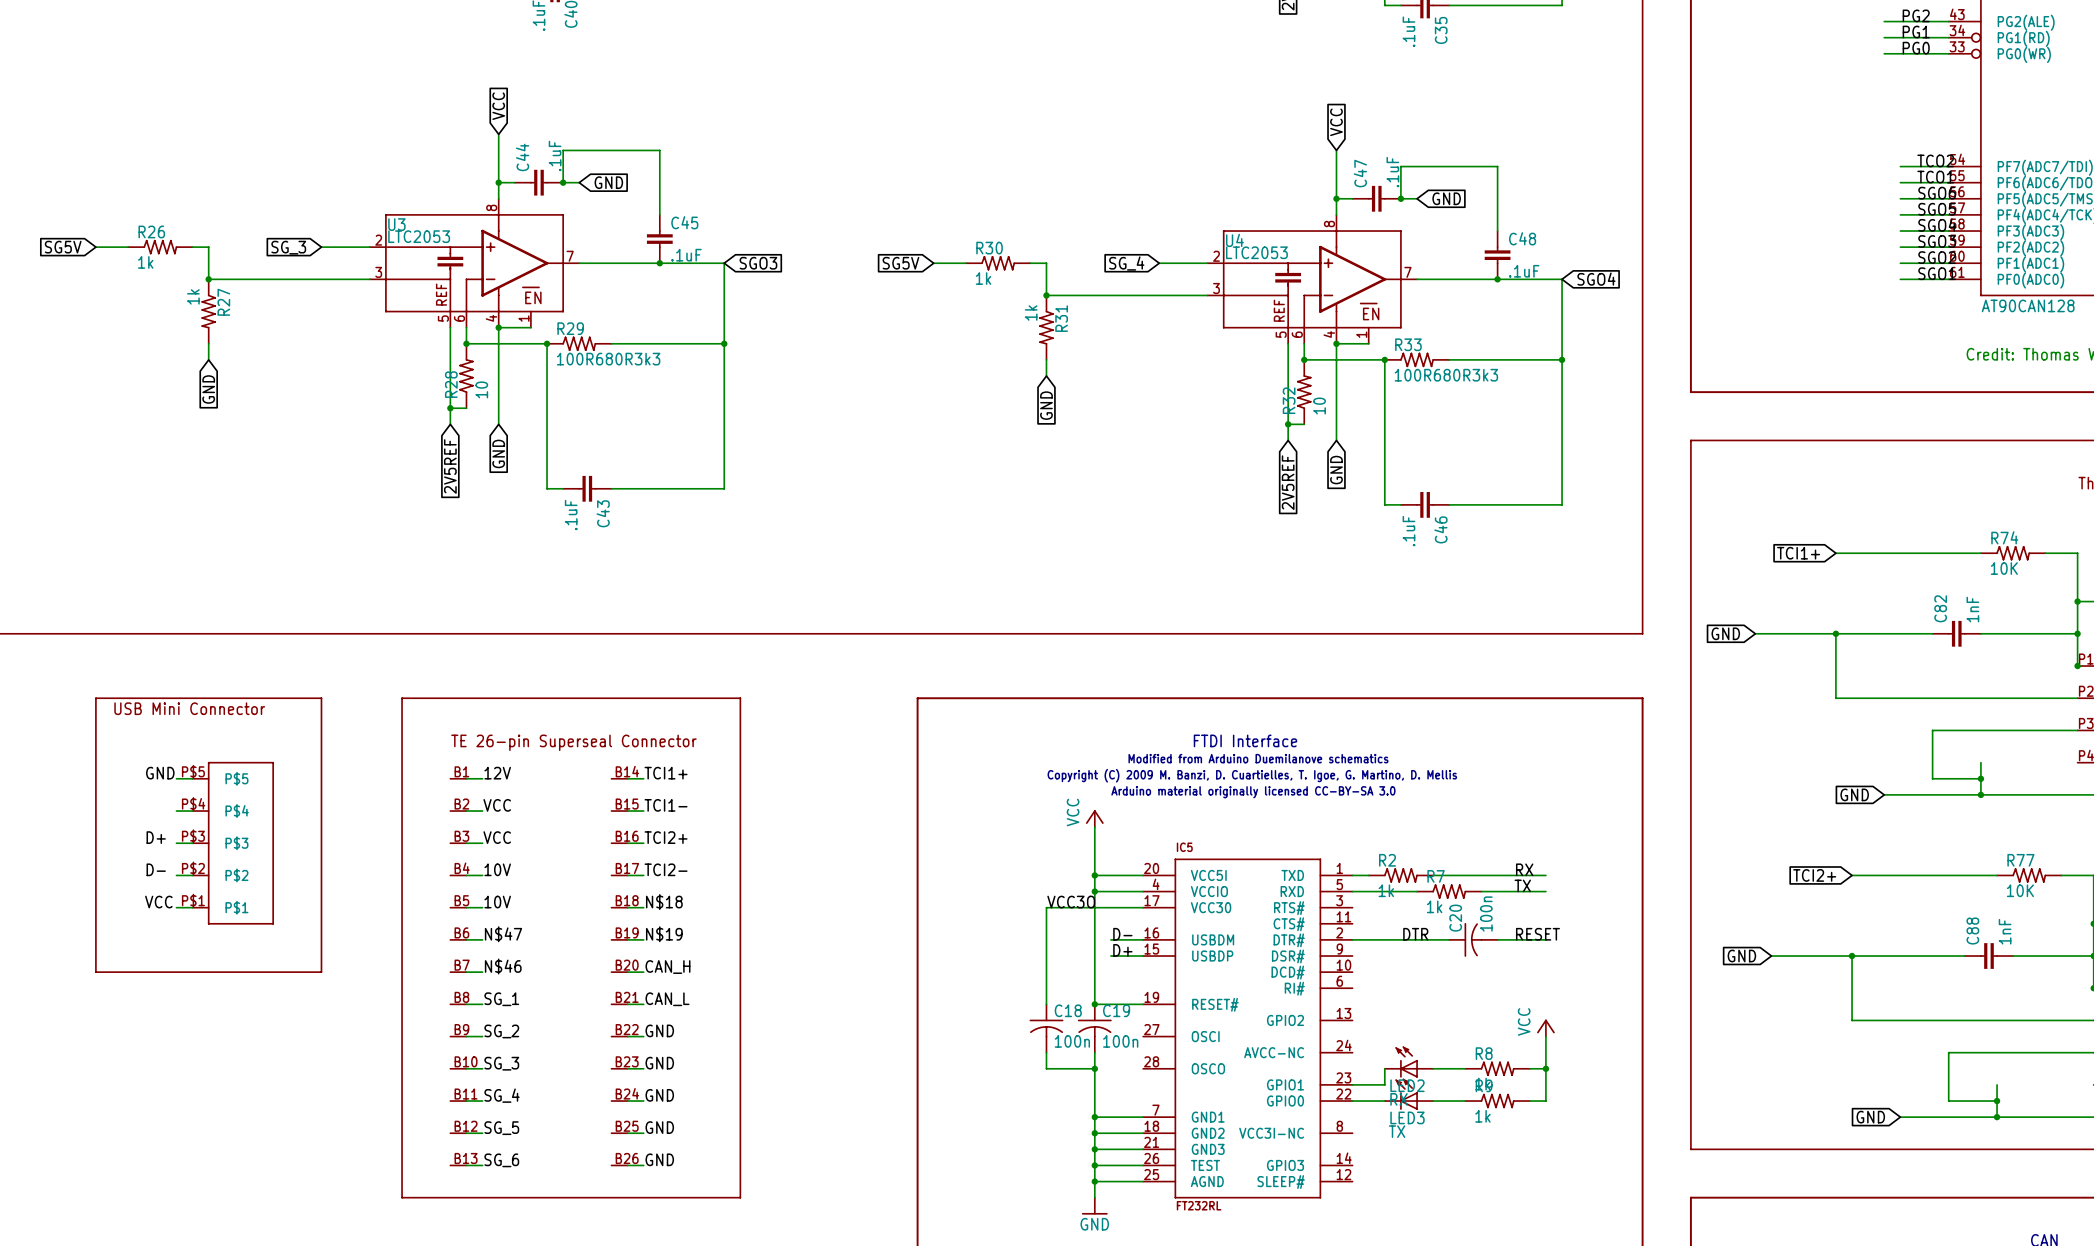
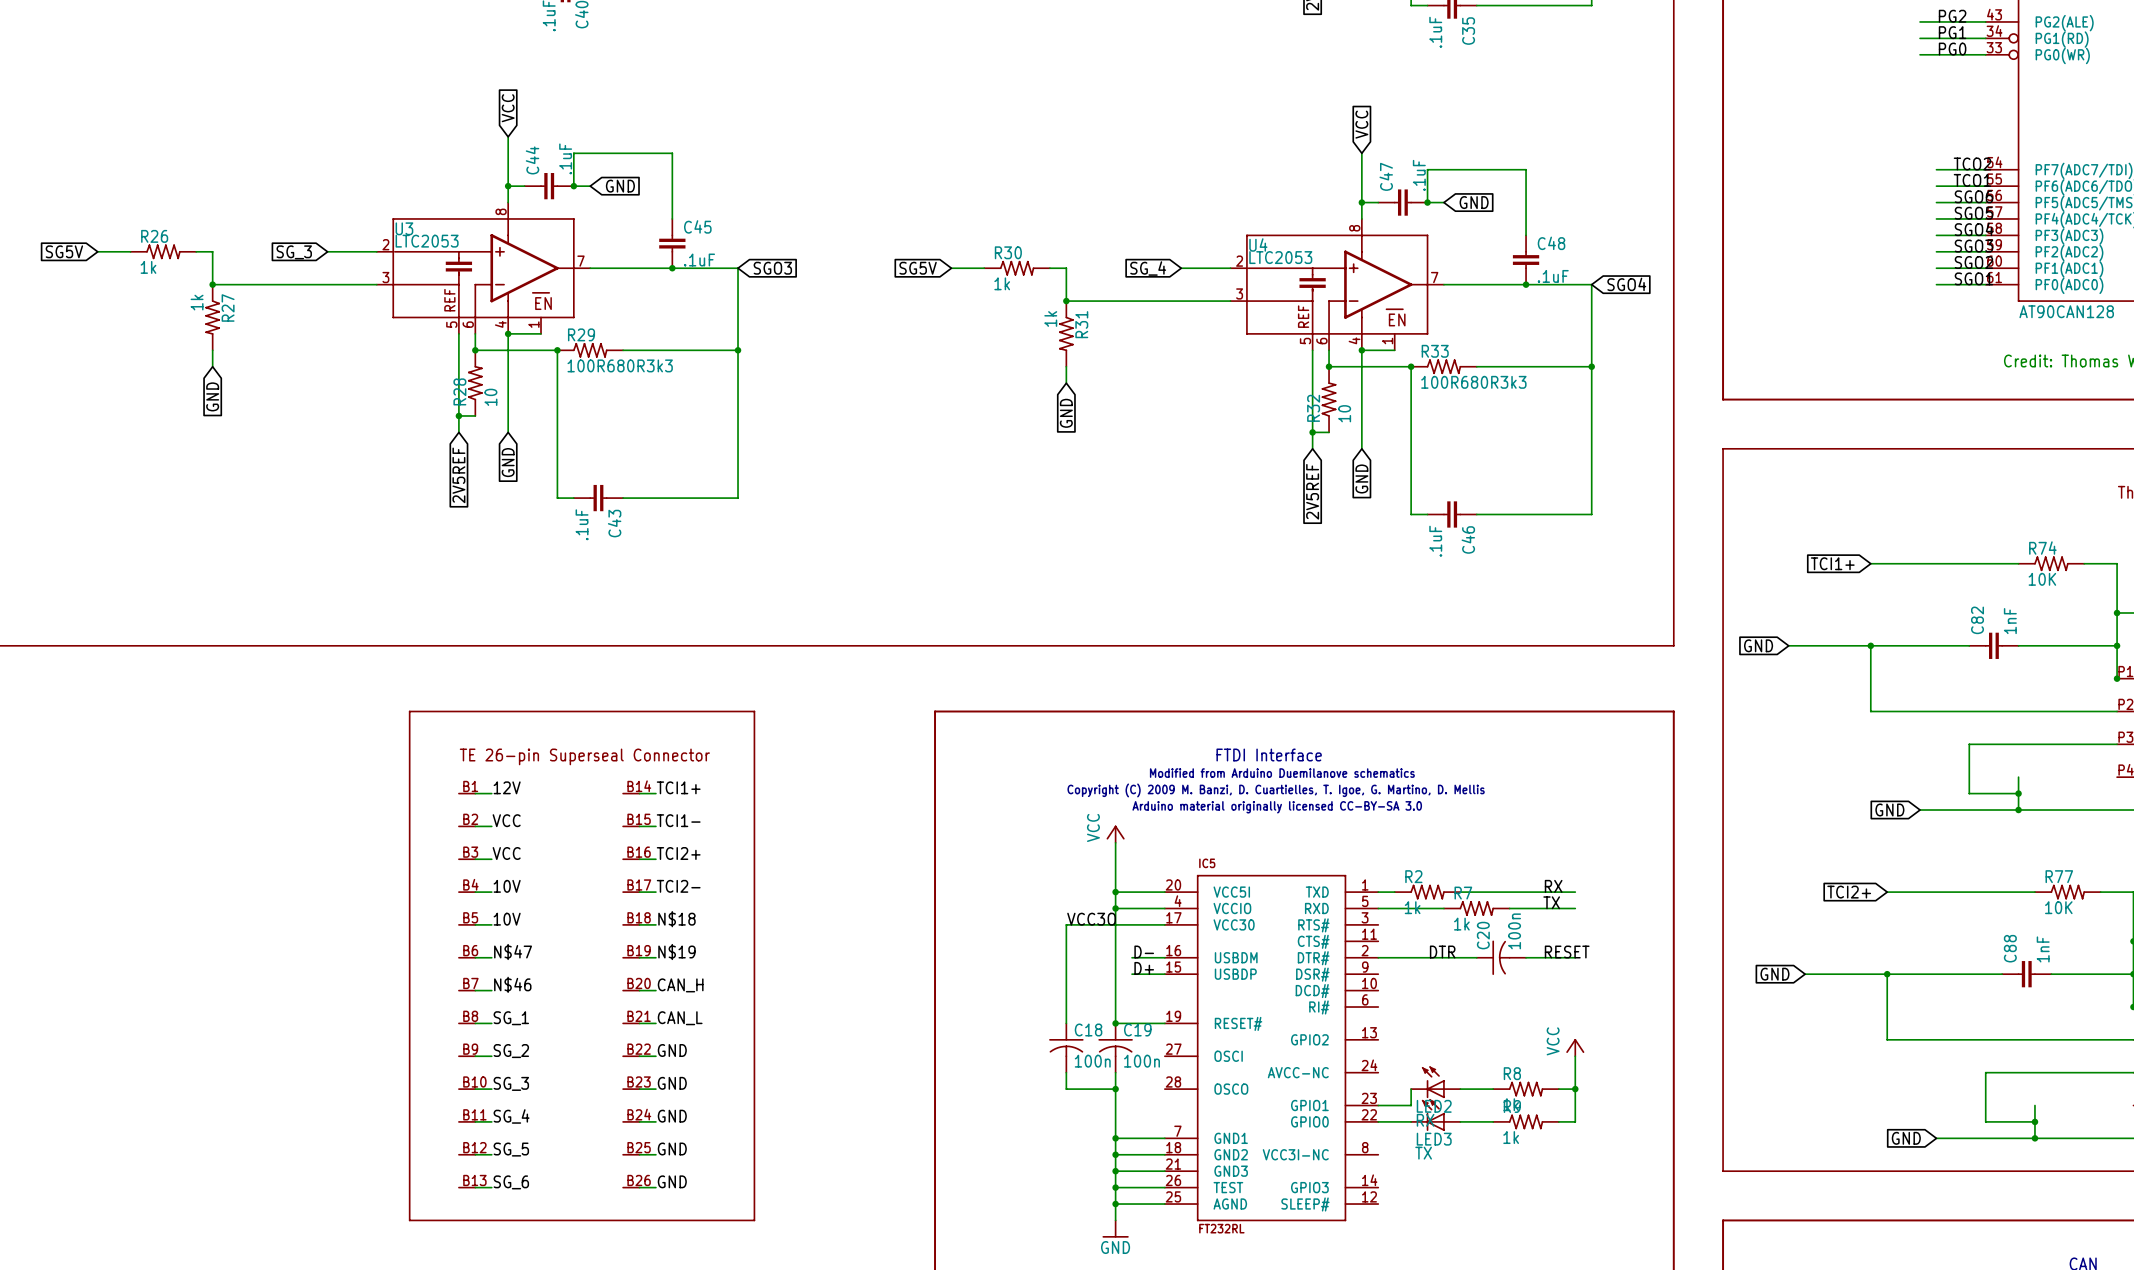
line: (95, 698) (95, 972) (321, 972) (321, 698) (95, 698) -> none
text: USB Mini Connector (189, 708) -> none
label: GND (160, 773) -> none
wire: (176, 778) (192, 778) -> none
wire: (176, 811) (192, 811) -> none
label: D+ (156, 837) -> none
wire: (176, 843) (192, 843) -> none
part: (233, 843) -> none
label: D- (156, 869) -> none
wire: (176, 875) (192, 875) -> none
label: VCC (158, 902) -> none
wire: (176, 907) (192, 907) -> none

